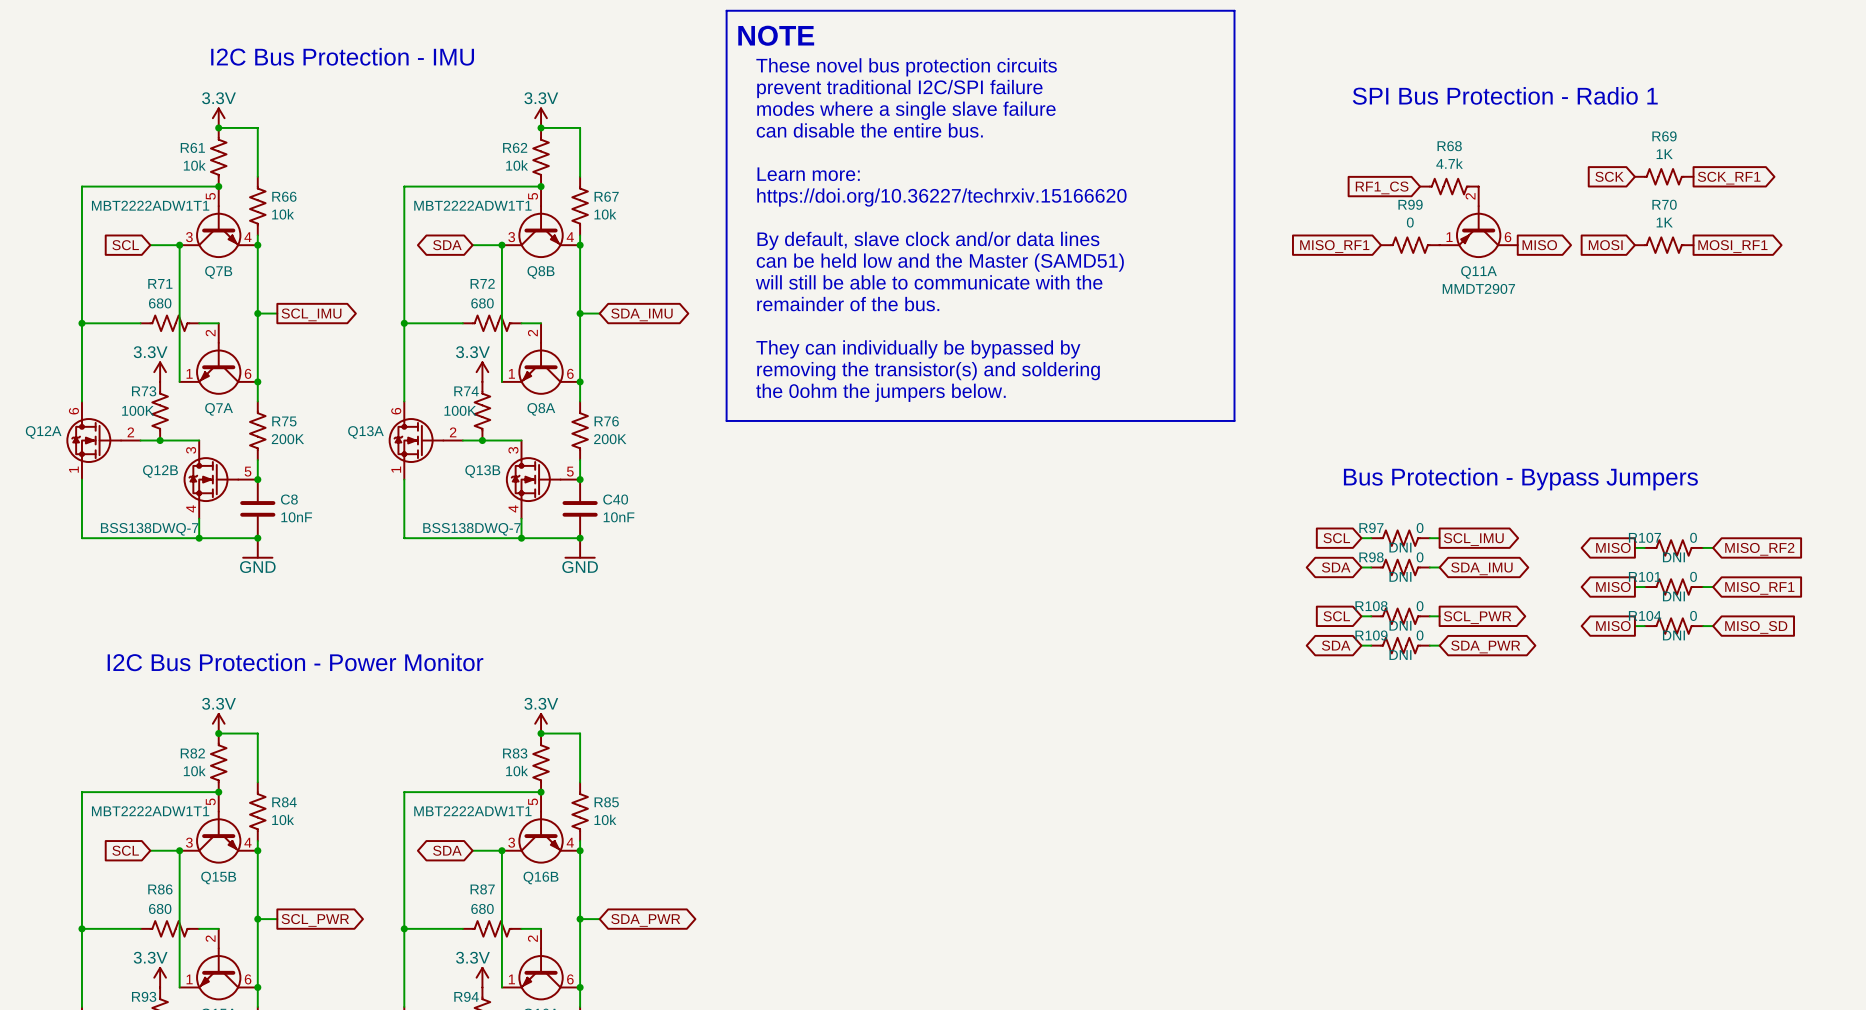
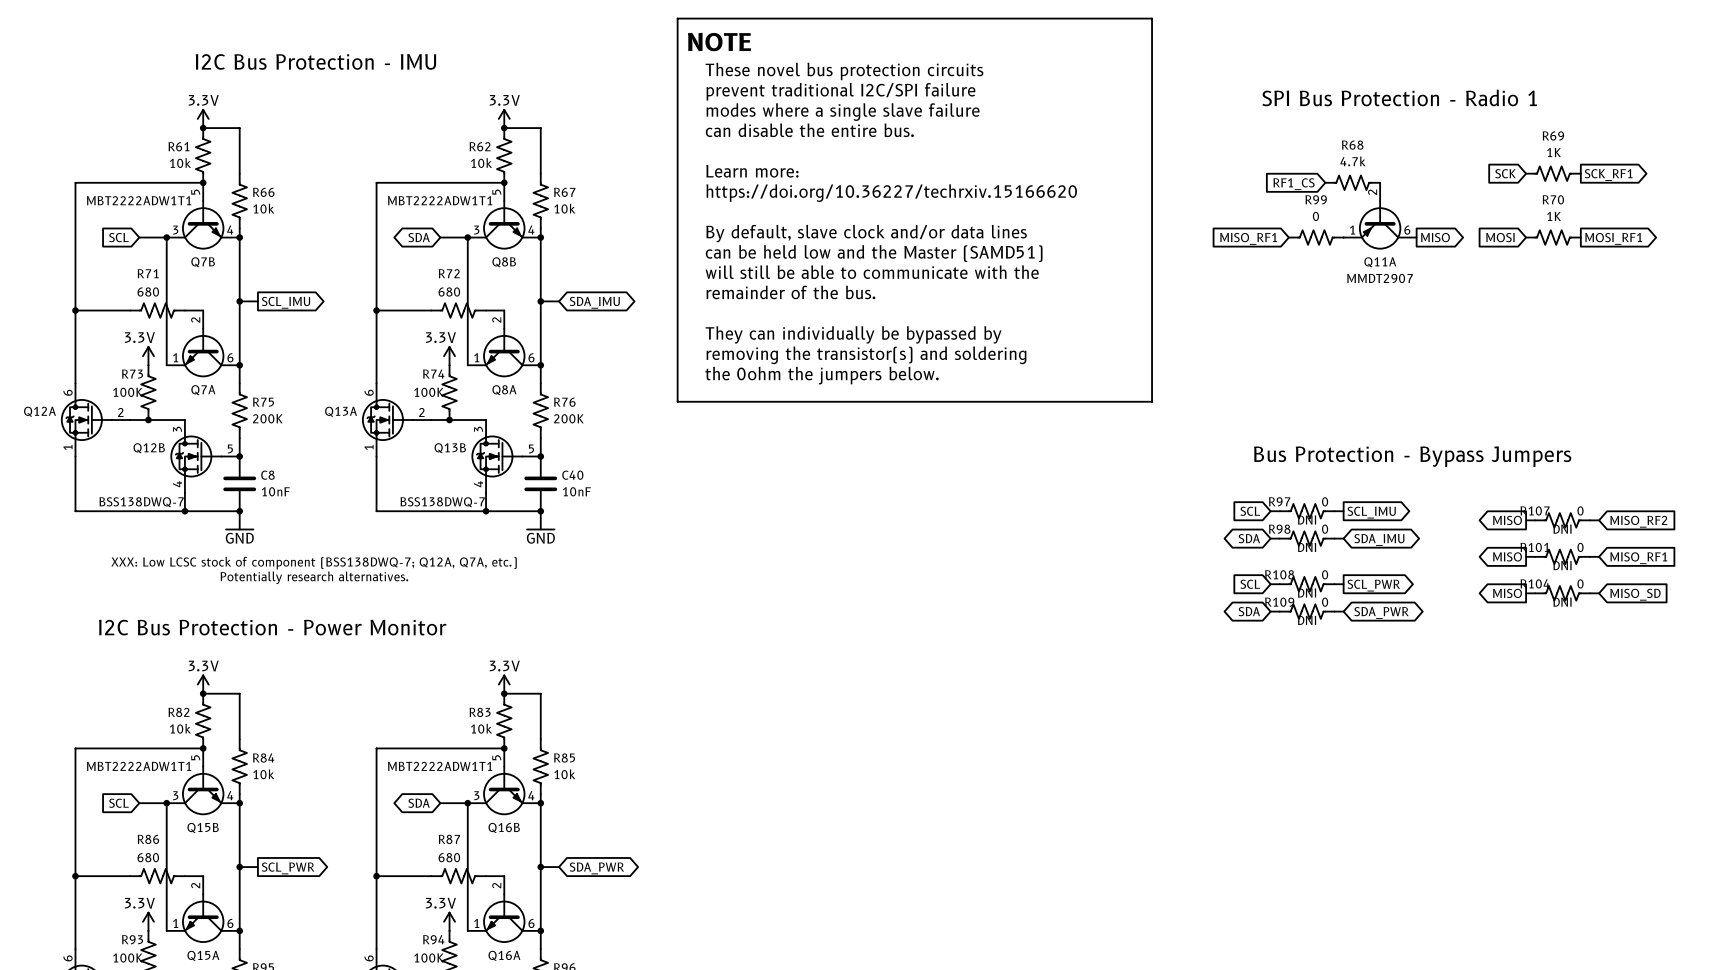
text: none -> XXX: Low LCSC stock of component (BSS138DWQ-7; Q12A, Q7A, etc.) (314, 563)
text: none -> Potentially research alternatives. (314, 577)

